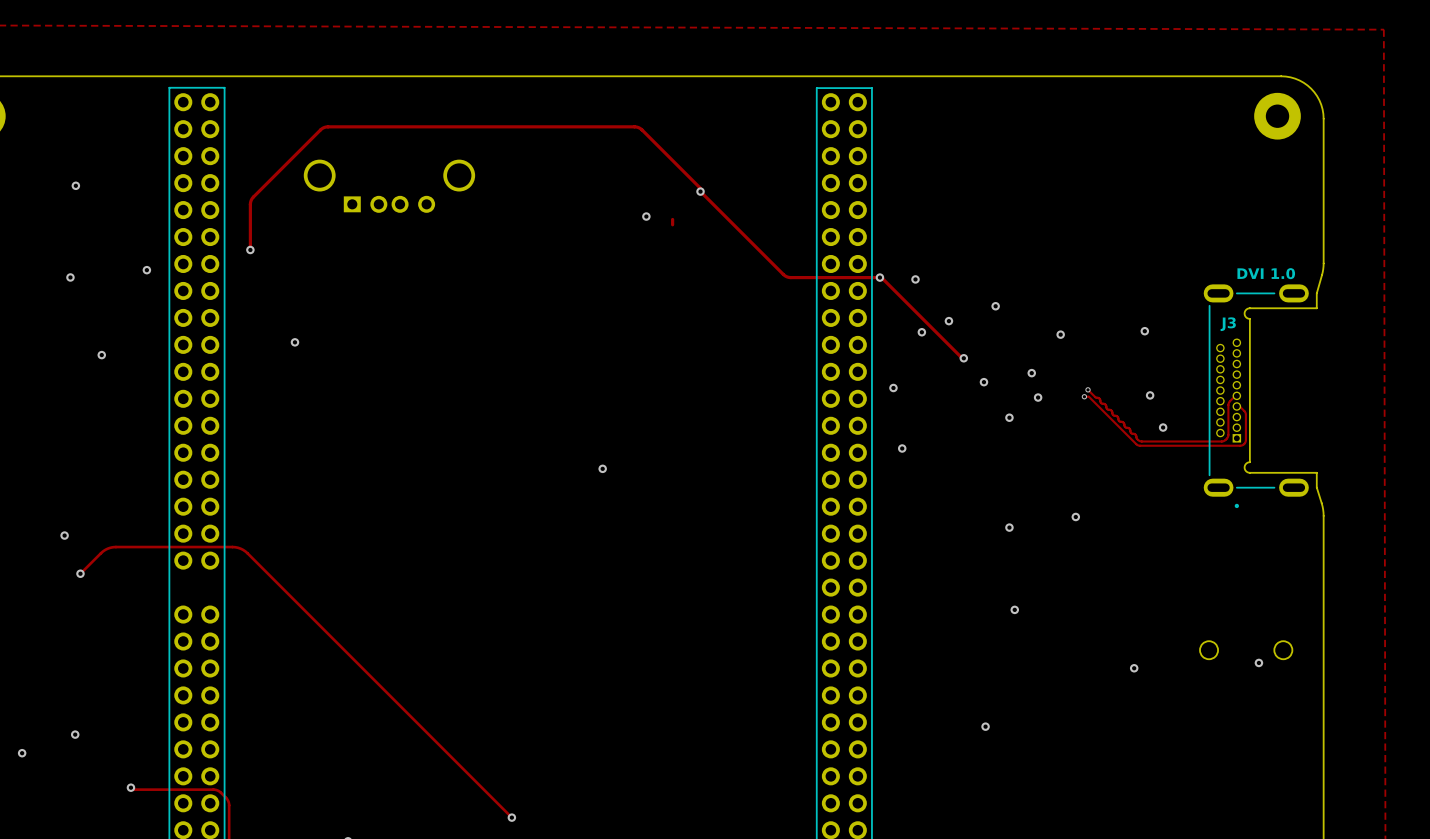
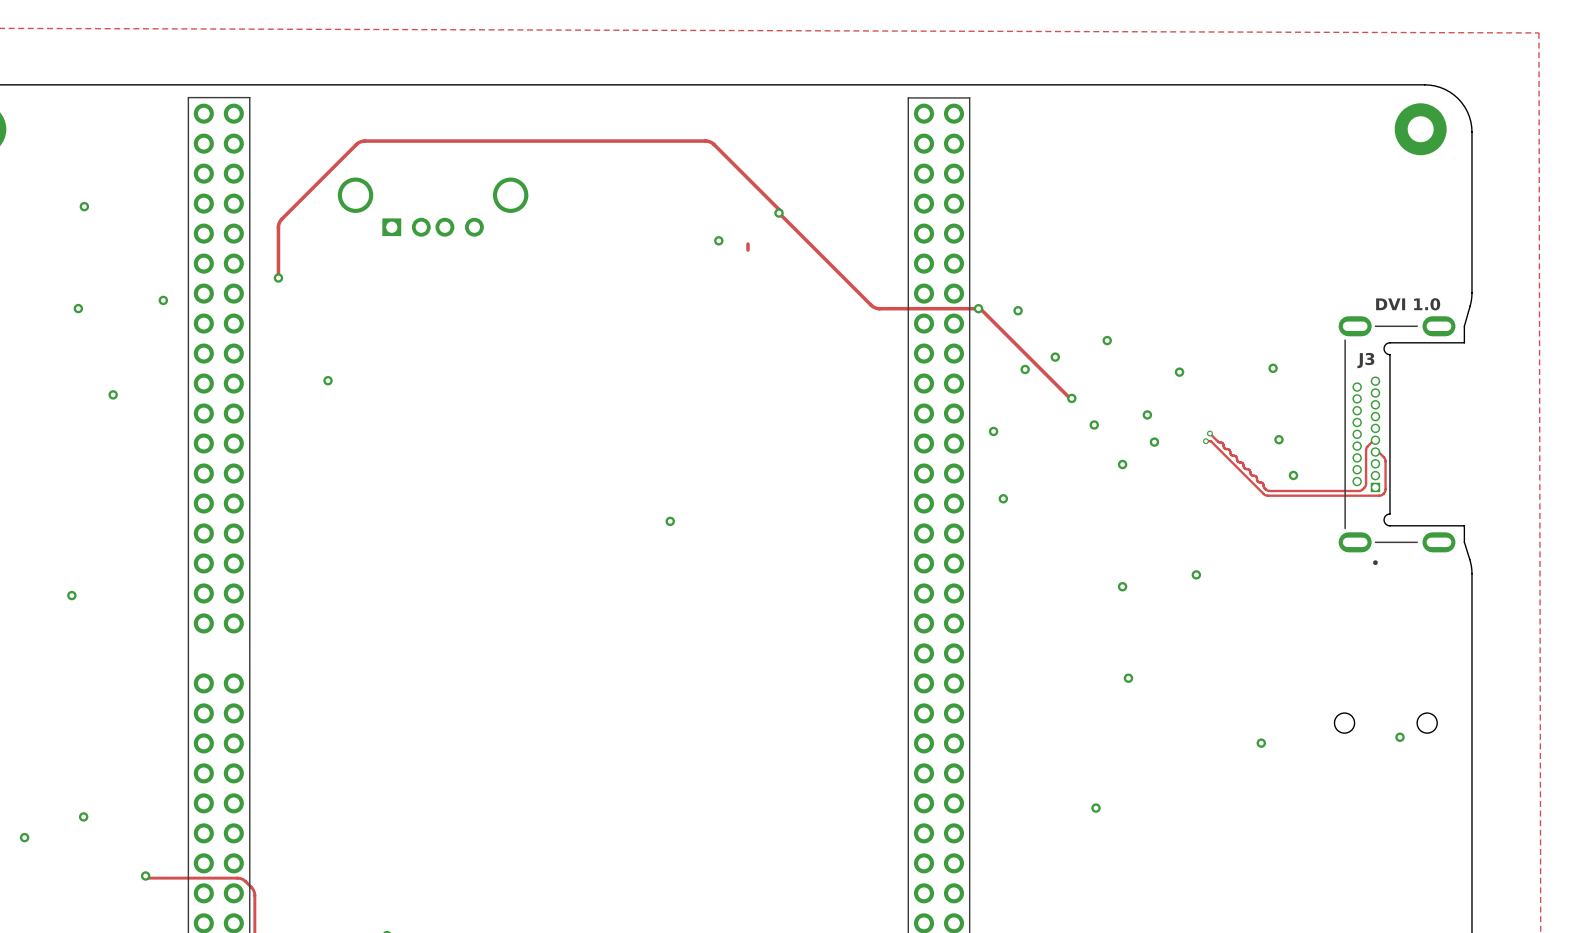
track: (80, 573) (102, 551) (113, 547) (232, 547) (243, 549) (511, 817) -> none
via: (80, 573) -> none
via: (511, 817) -> none

